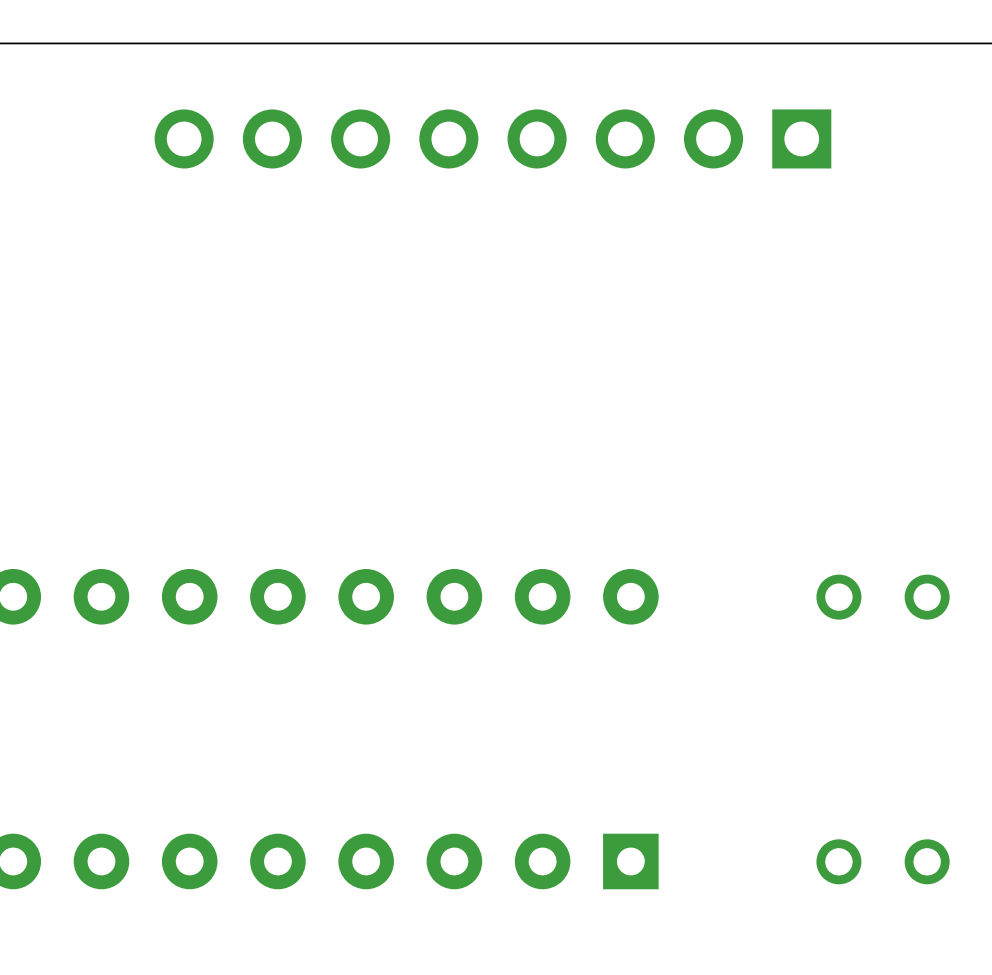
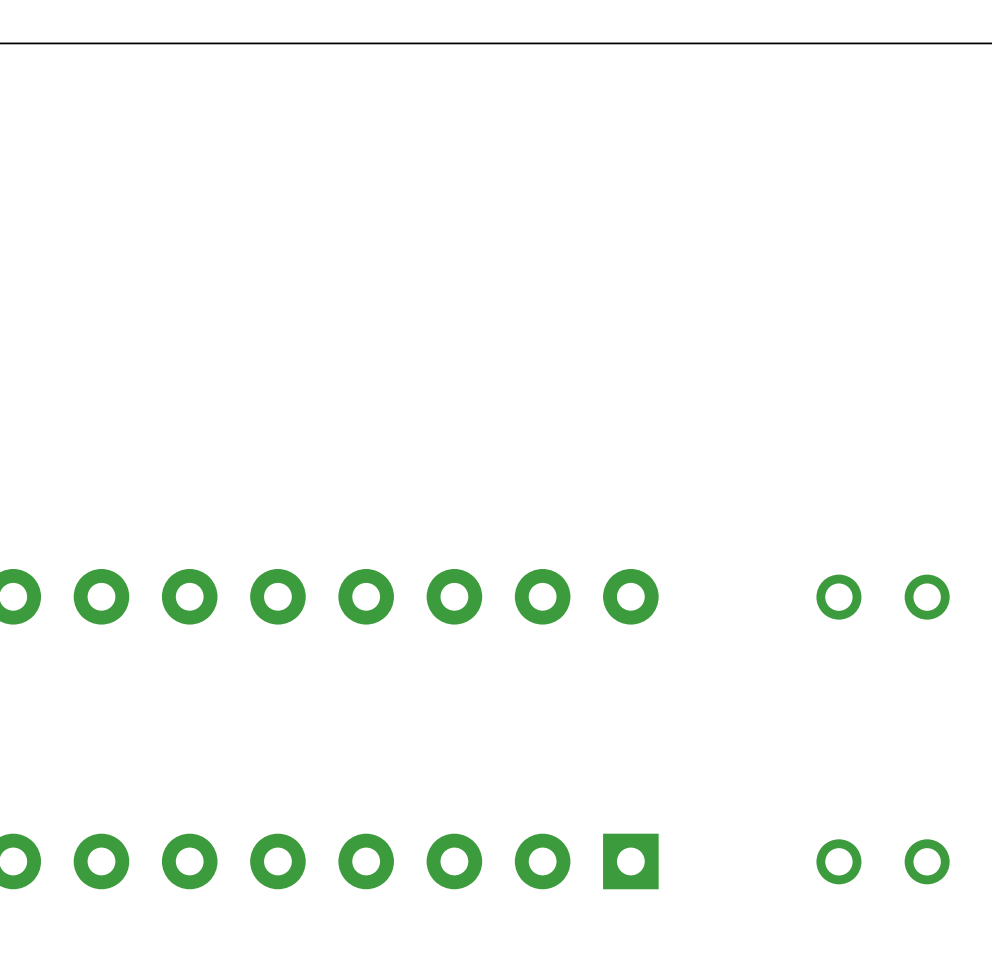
part: (492, 138) -> none

